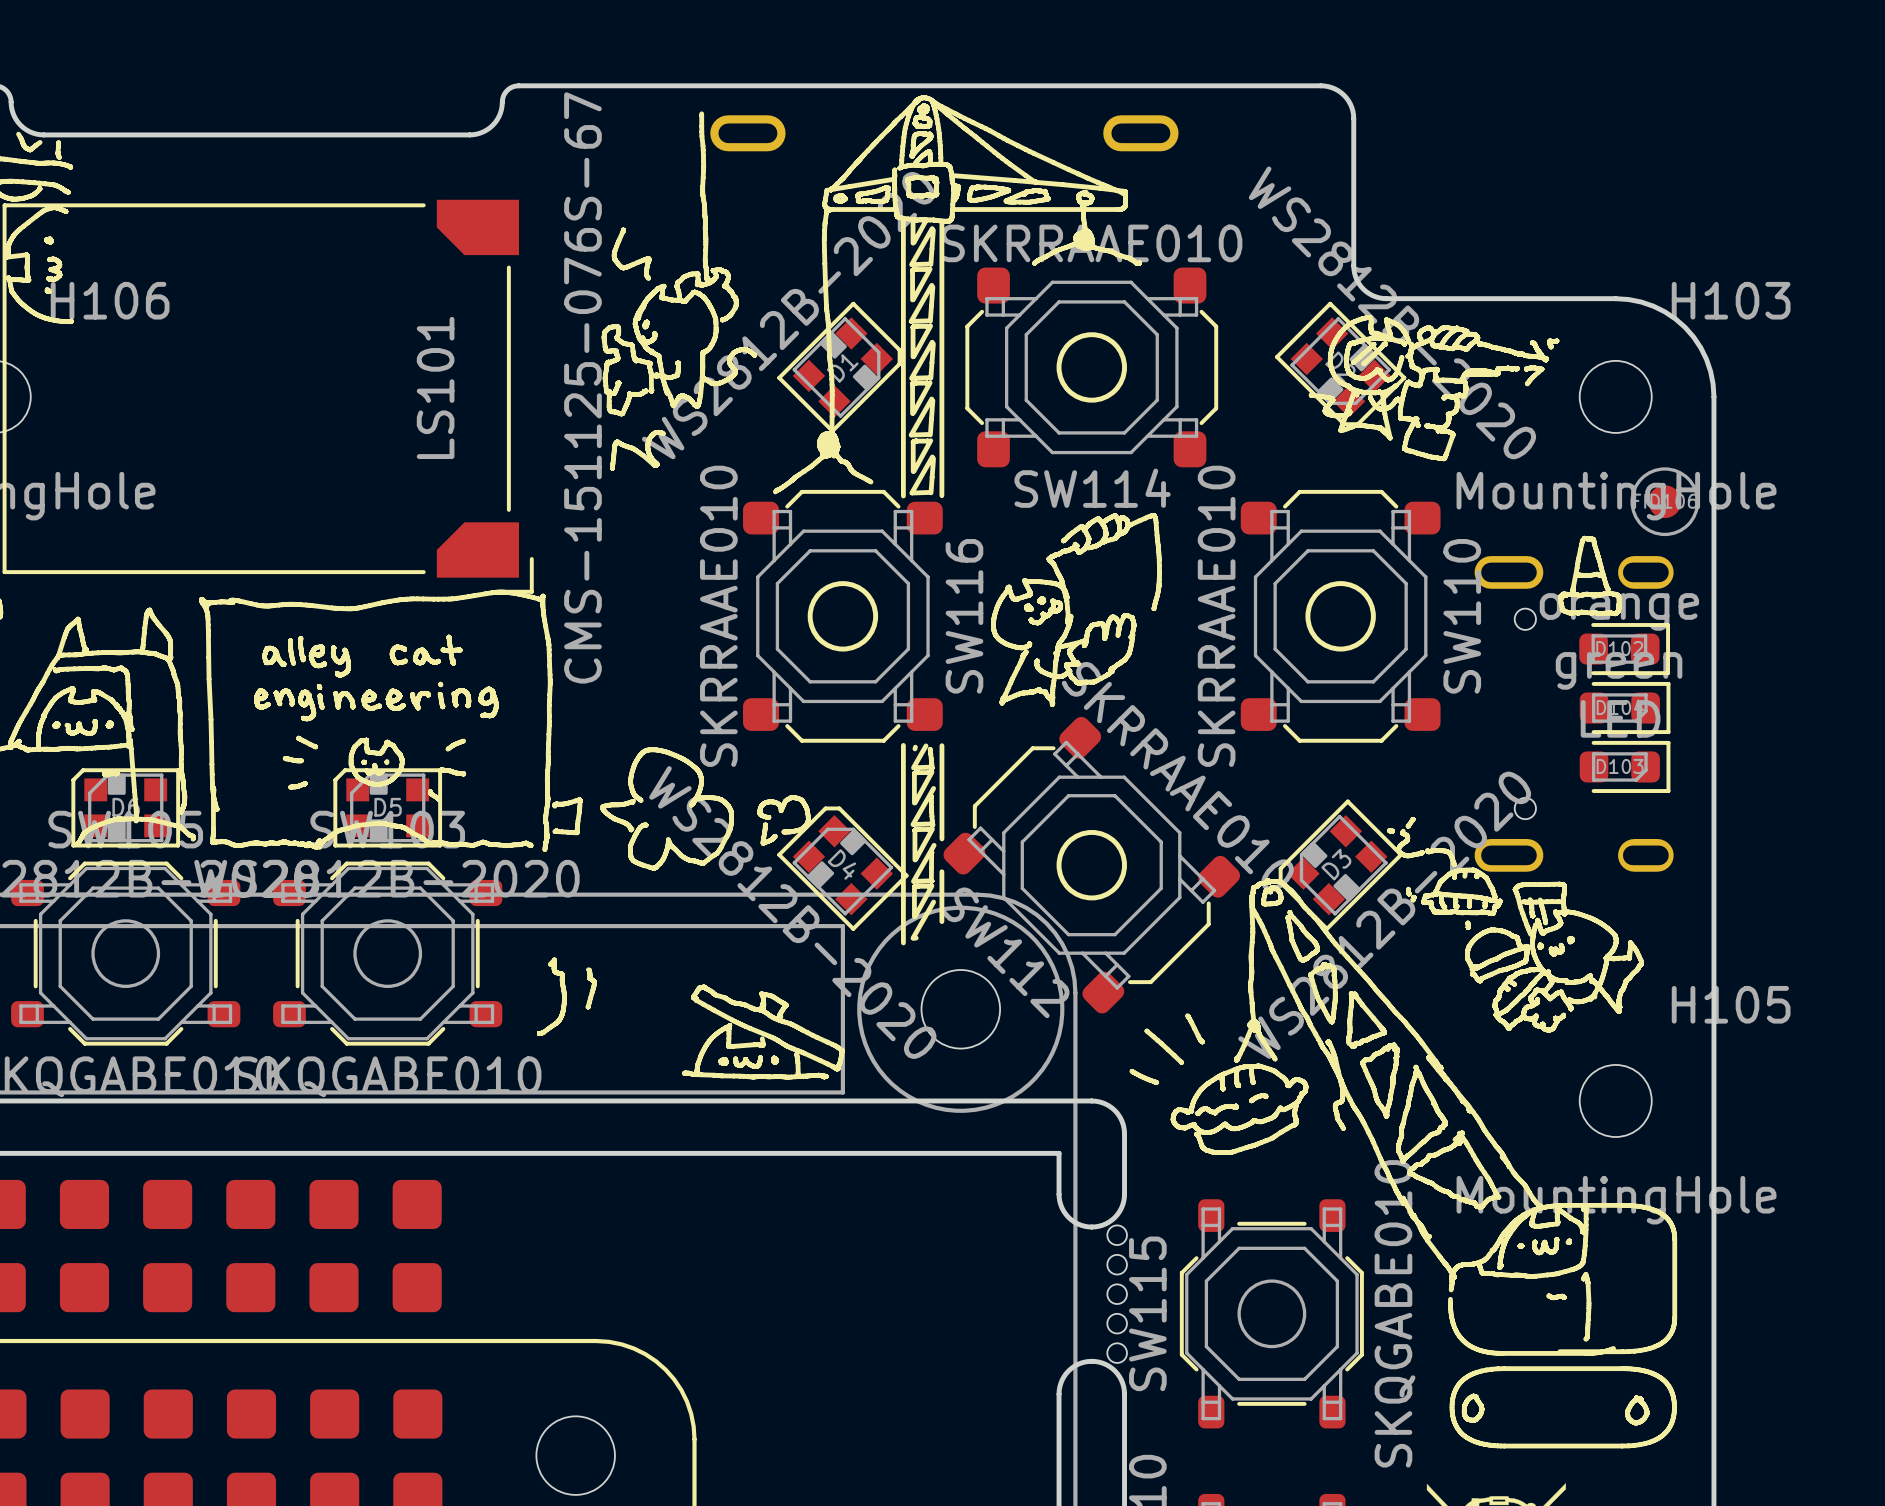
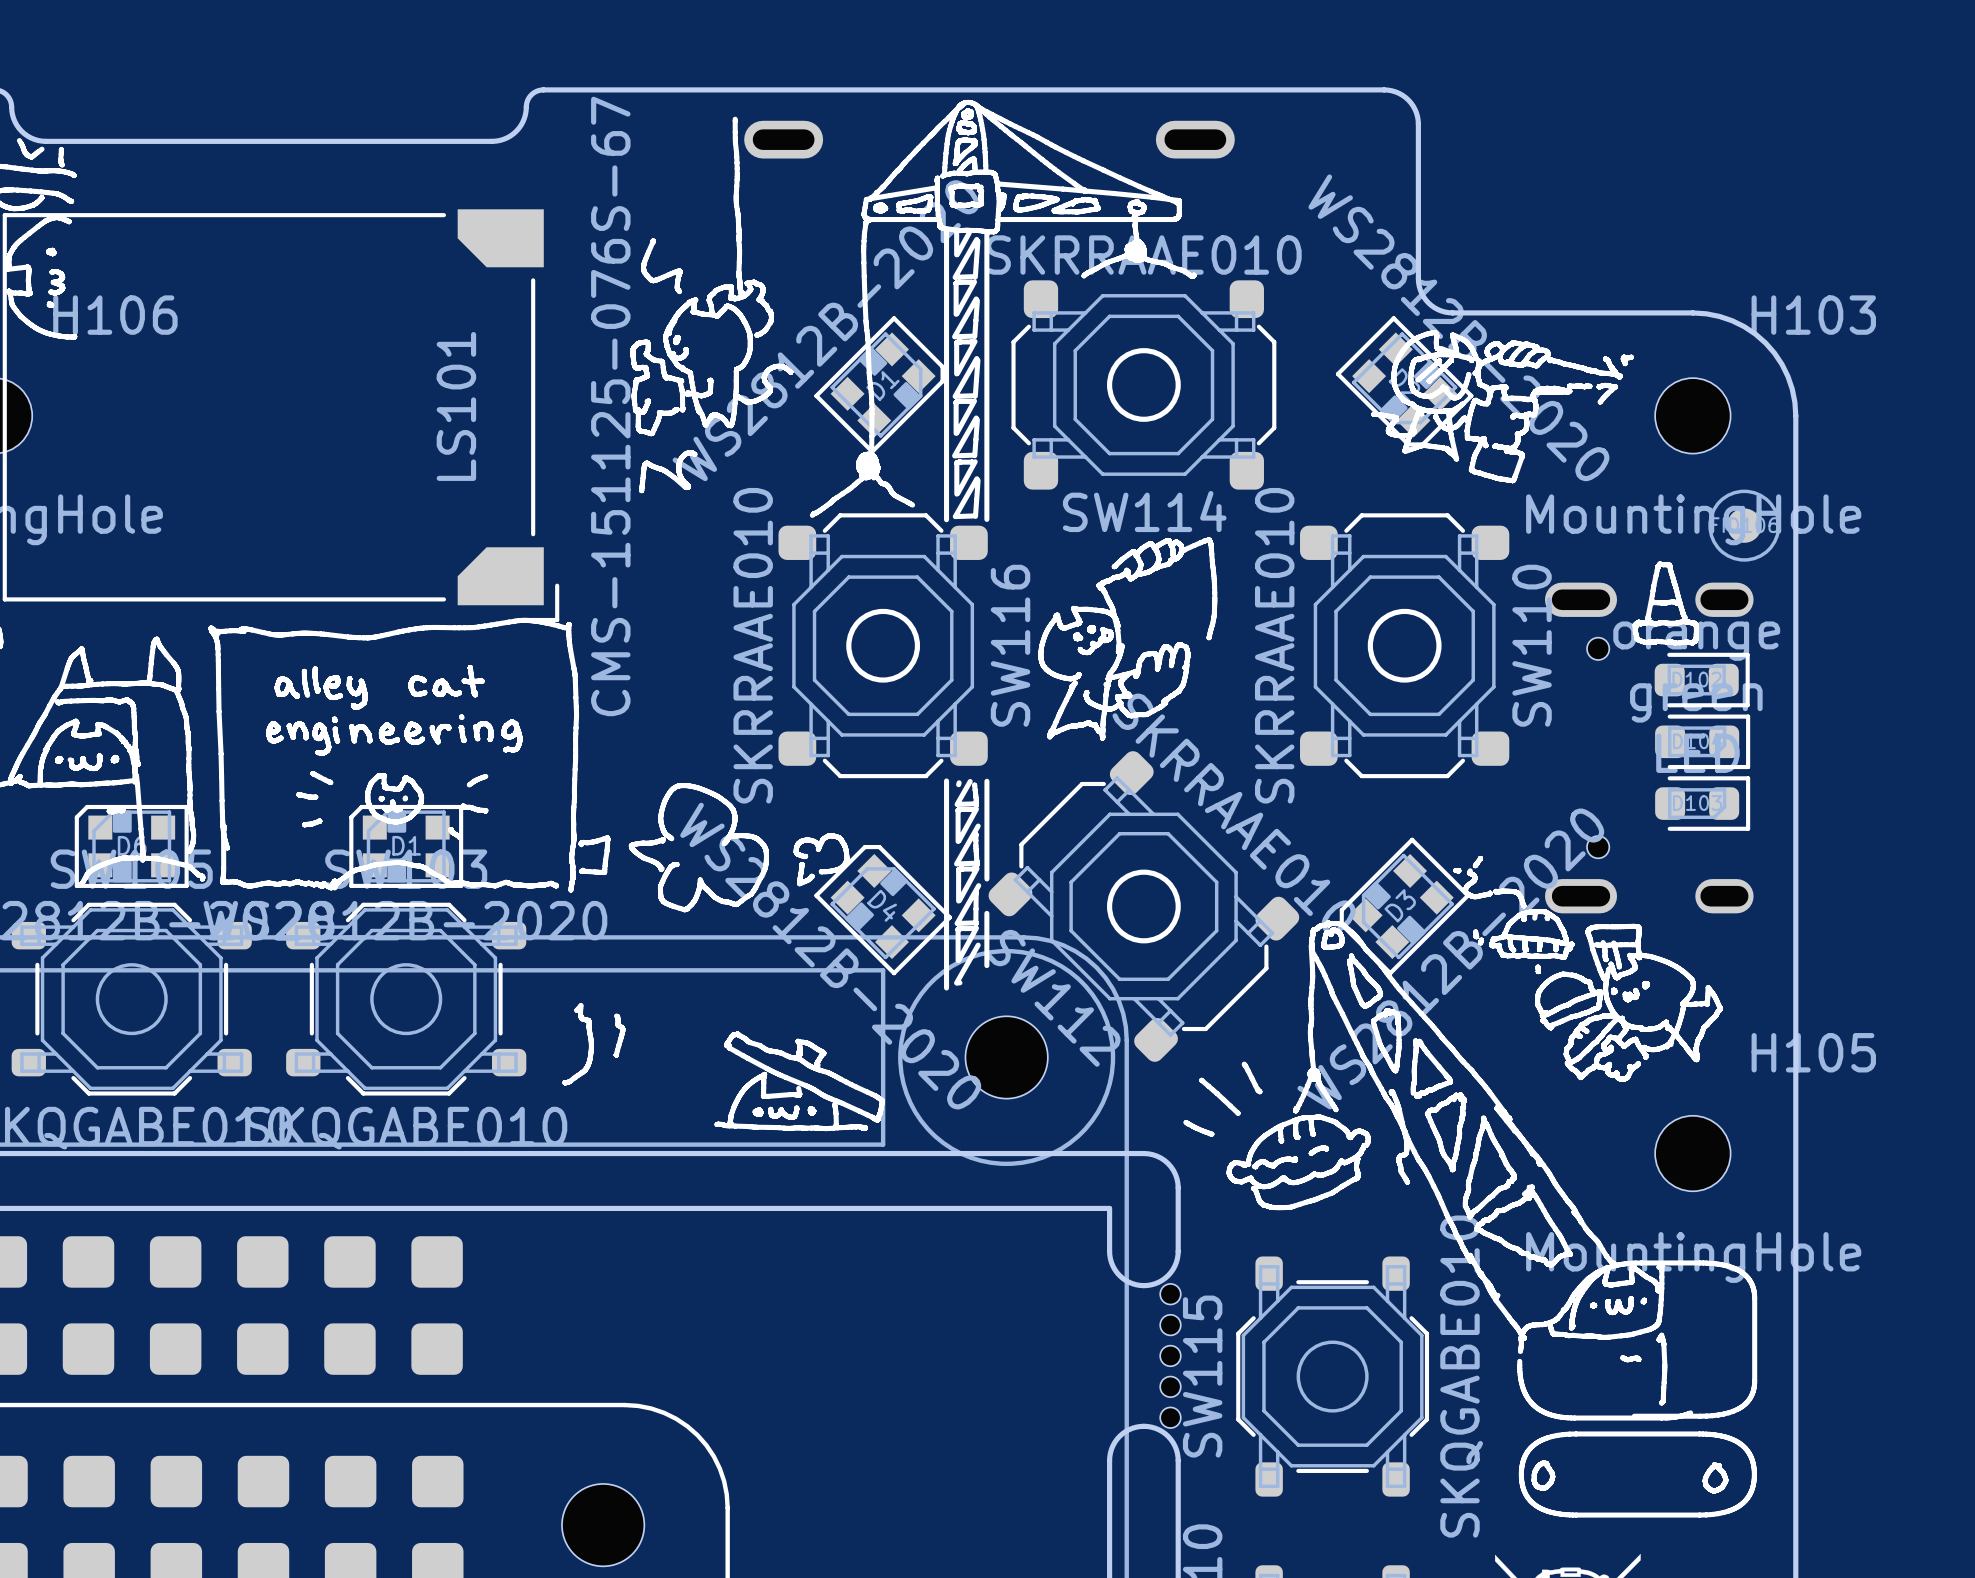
D5 name: D5 (388, 807) -> D1 (406, 845)

